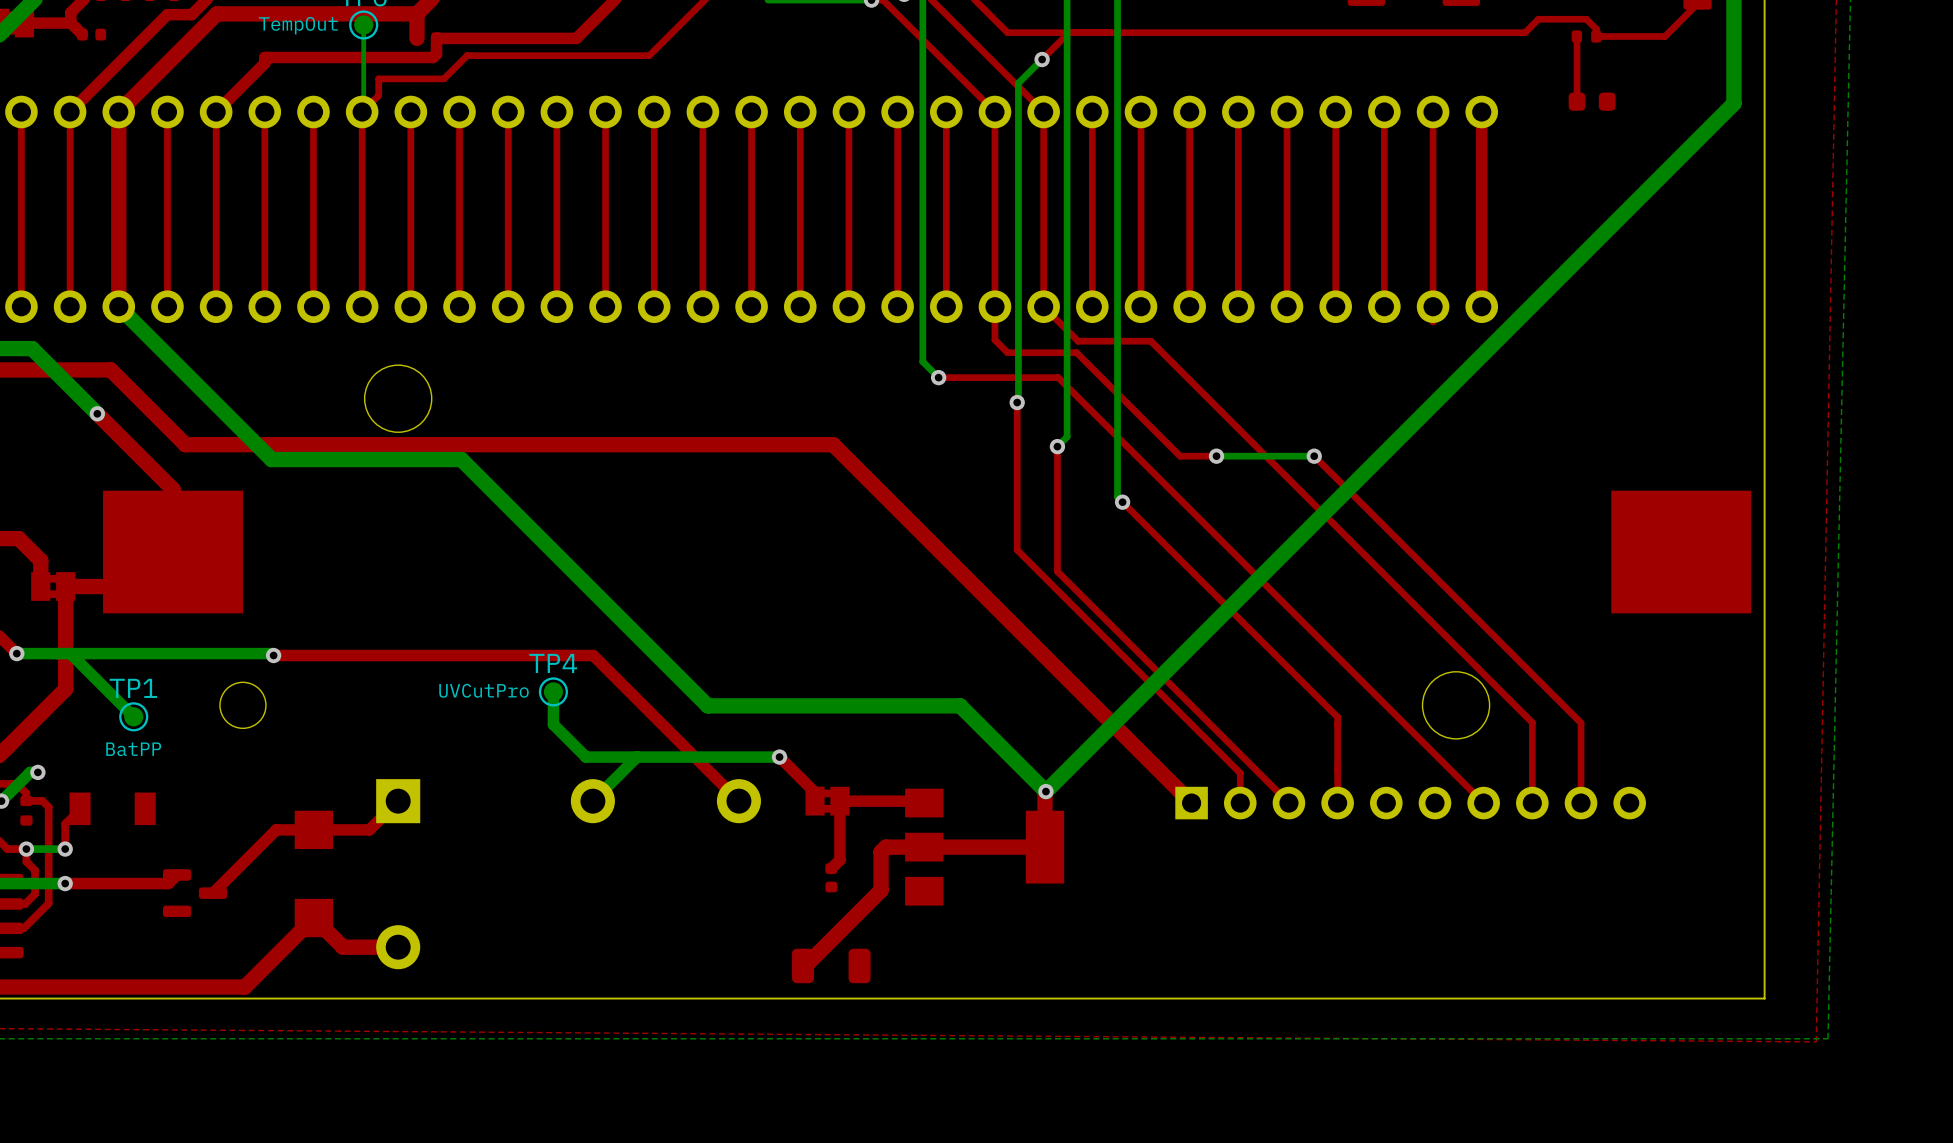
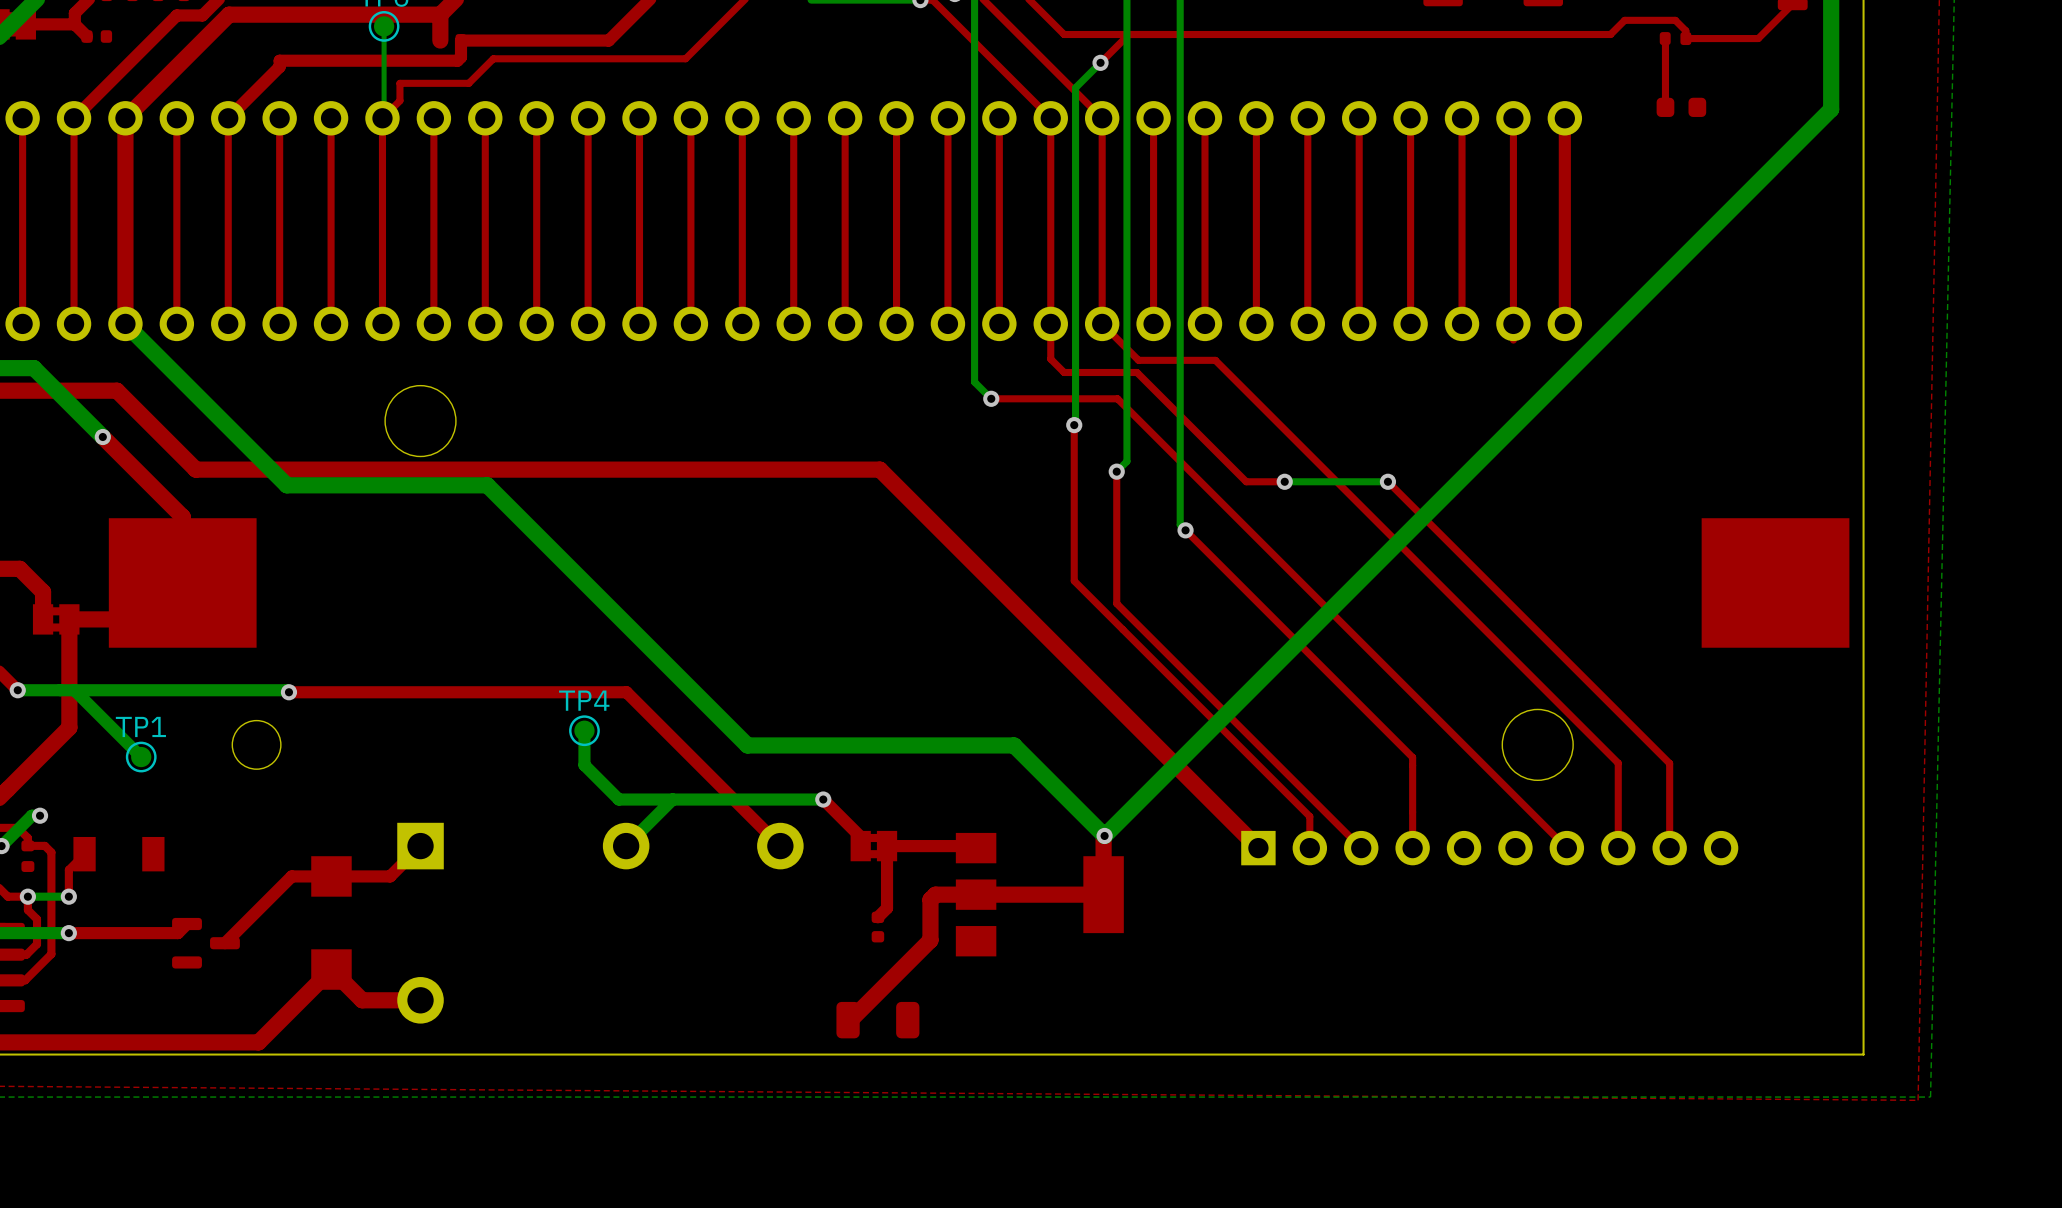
text: TempOut (298, 25) -> none
text: UVCutPro (483, 690) -> none
text: BatPP (133, 749) -> none

